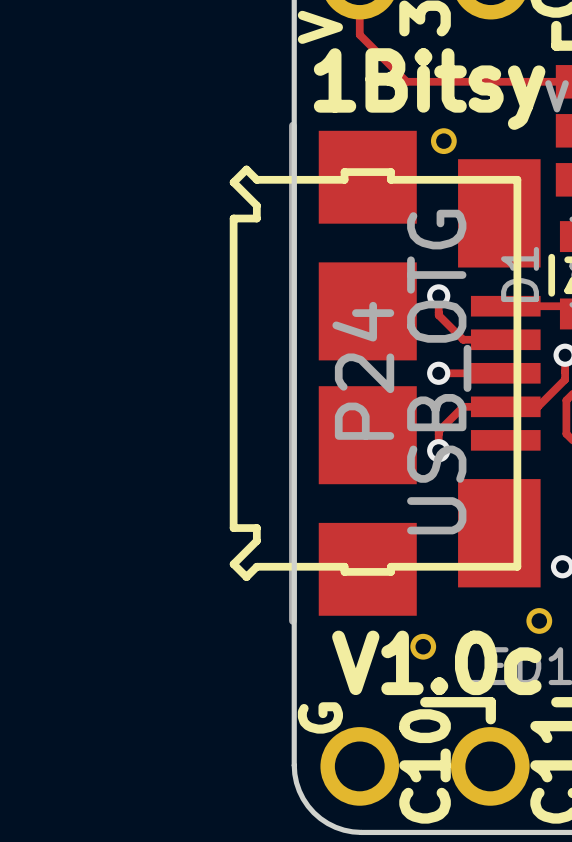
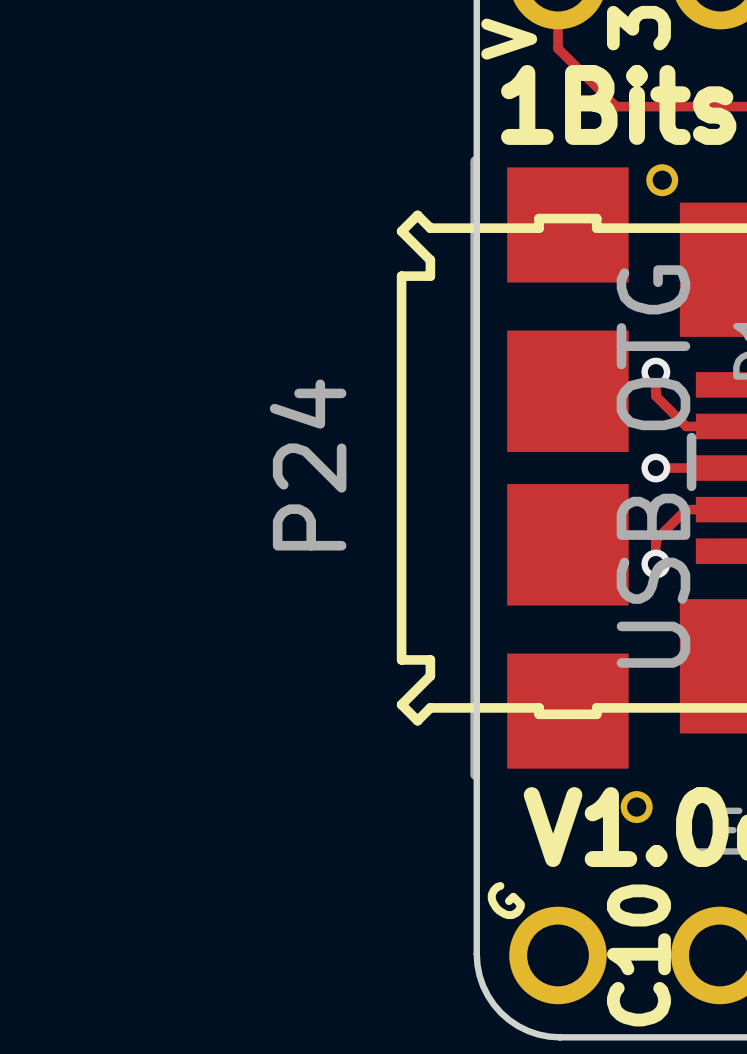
P24 name position: P24 (363, 370) -> P24 (308, 464)
line: (425, 702) (490, 702) (490, 719) -> none
text rotation: 0° (320, 717) -> 45° clockwise (506, 900)

